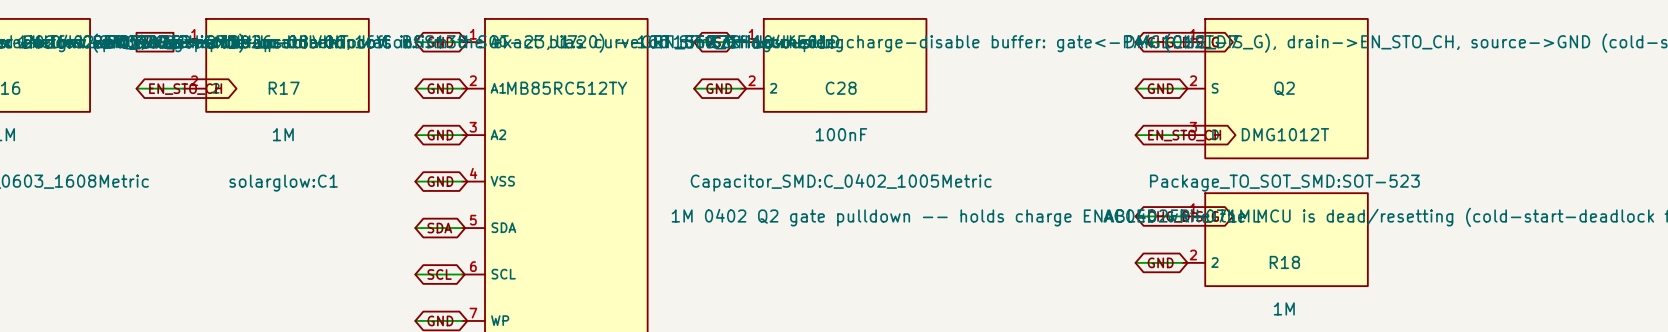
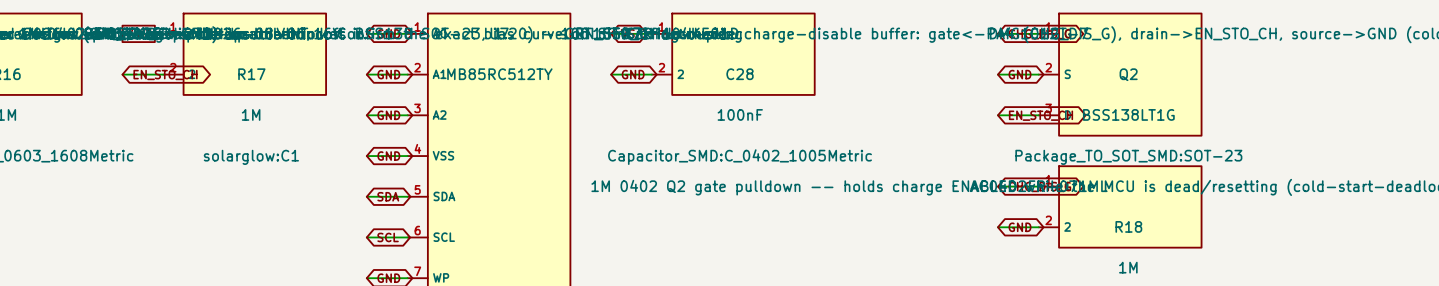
Q2 value: DMG1012T (1285, 134) -> BSS138LT1G (1128, 114)
Q2 text: Package_TO_SOT_SMD:SOT-523 (1284, 183) -> Package_TO_SOT_SMD:SOT-23 (1128, 157)

